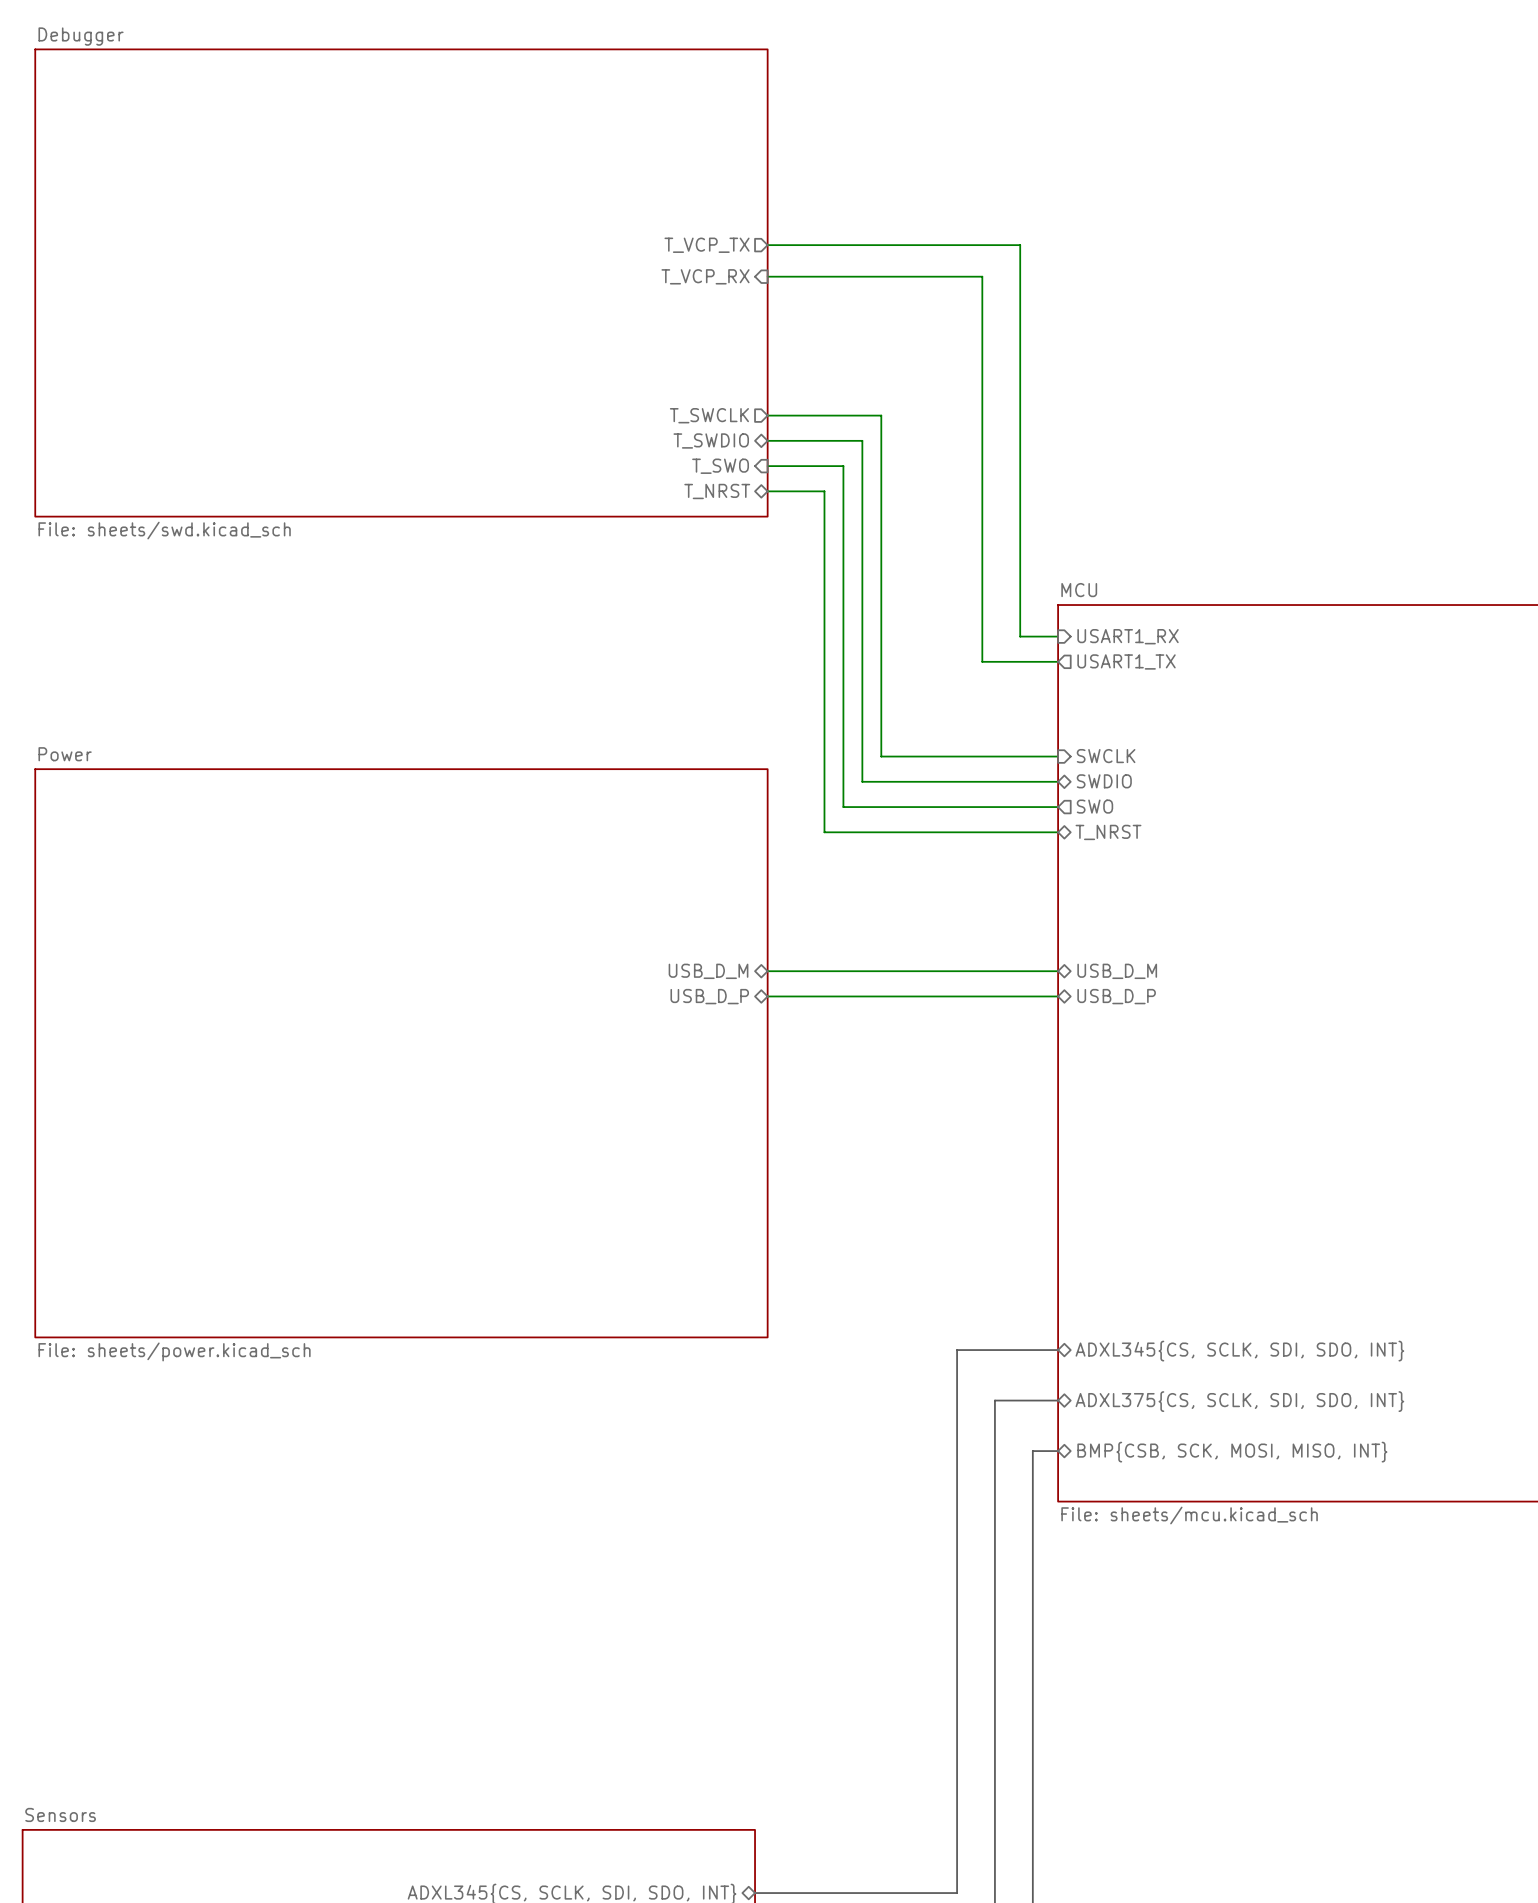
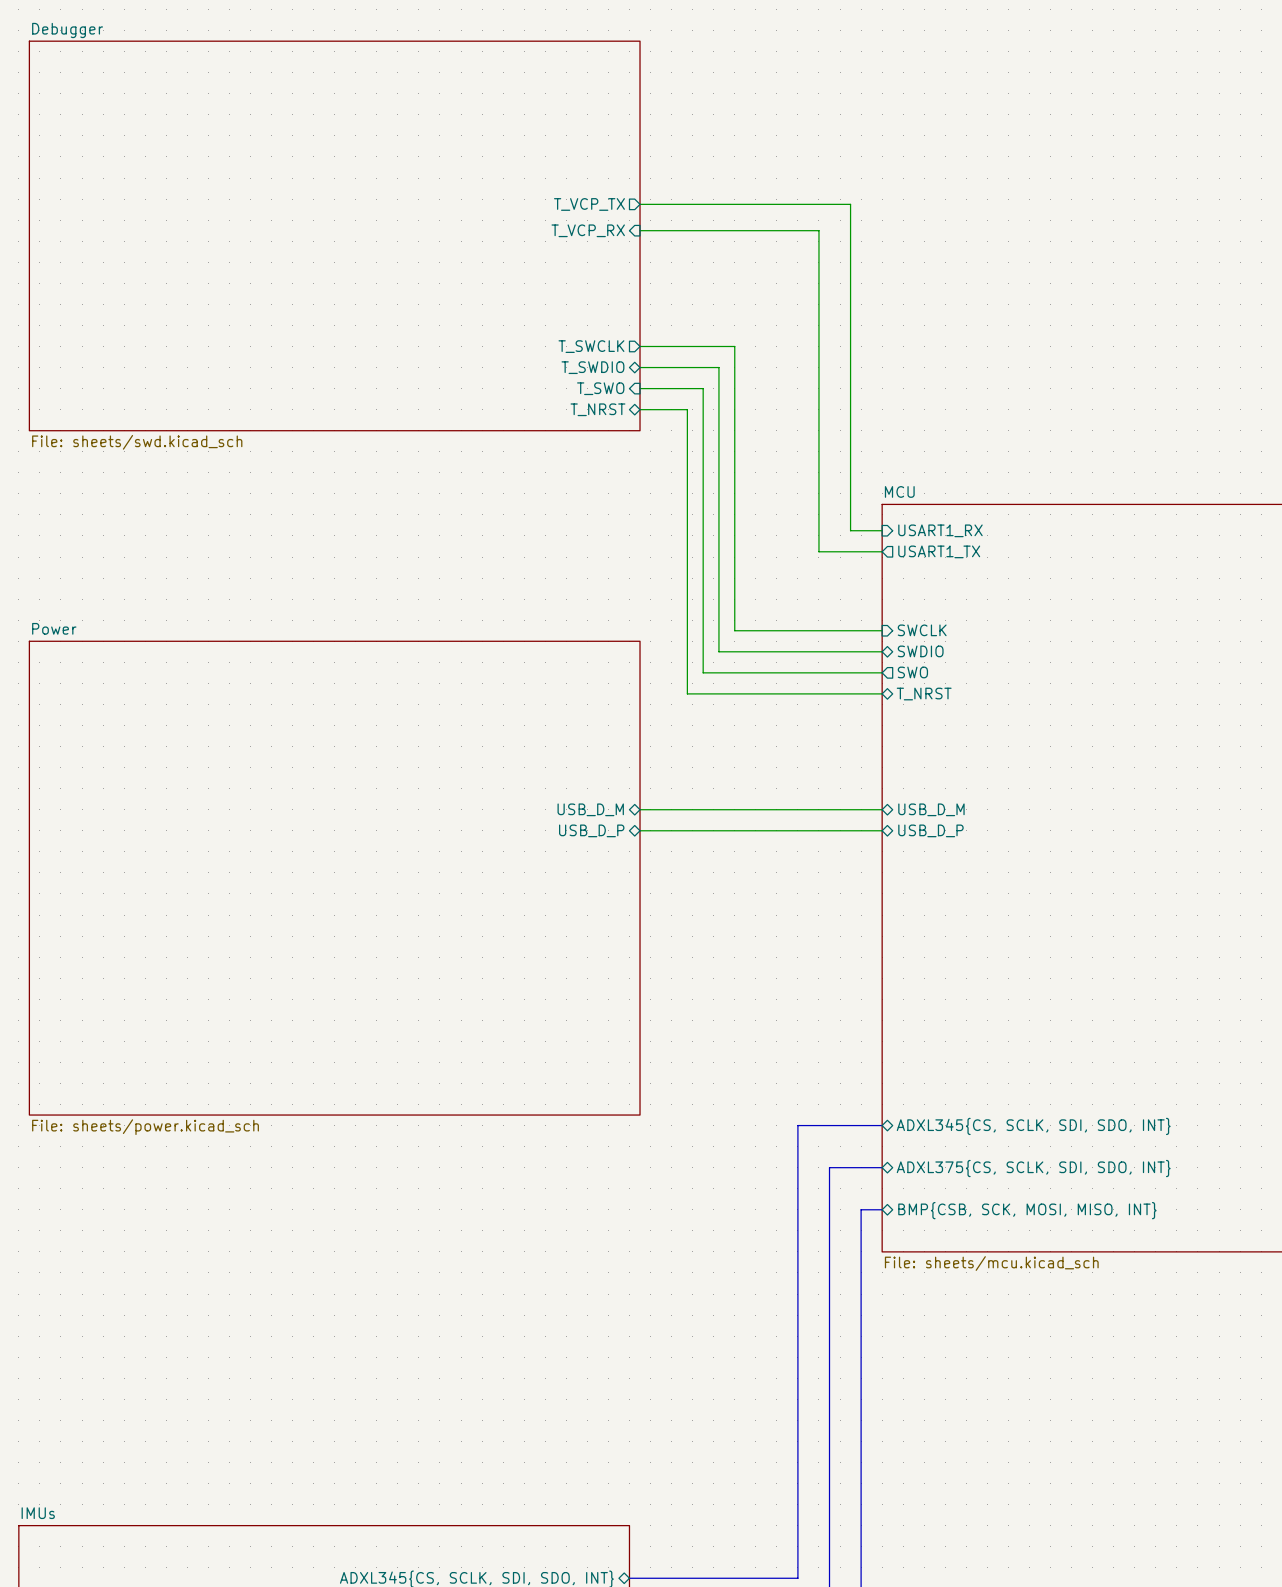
sheet Sensors name: Sensors (60, 1814) -> IMUs (38, 1513)

